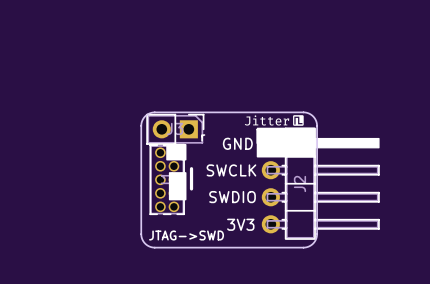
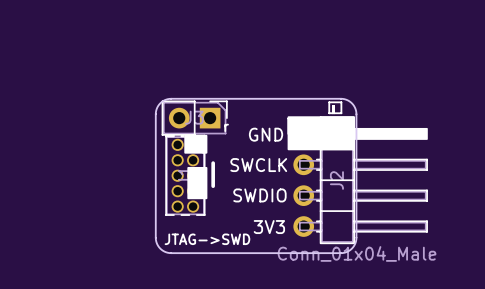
drawing: [244, 115, 304, 126] -> none
line: none -> (329, 102) (329, 113) (341, 113) (341, 102) (329, 102)
line: none -> (332, 113) (332, 105) (334, 113)
J2 value: none -> Conn_01x04_Male (357, 253)

